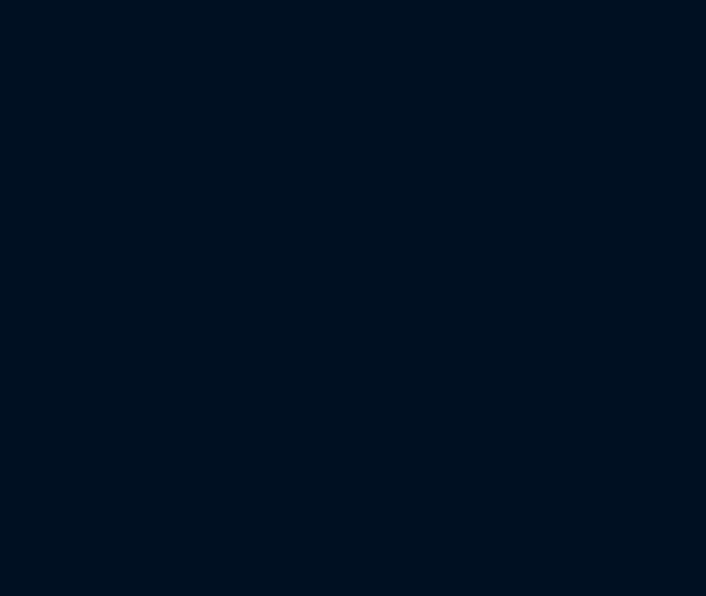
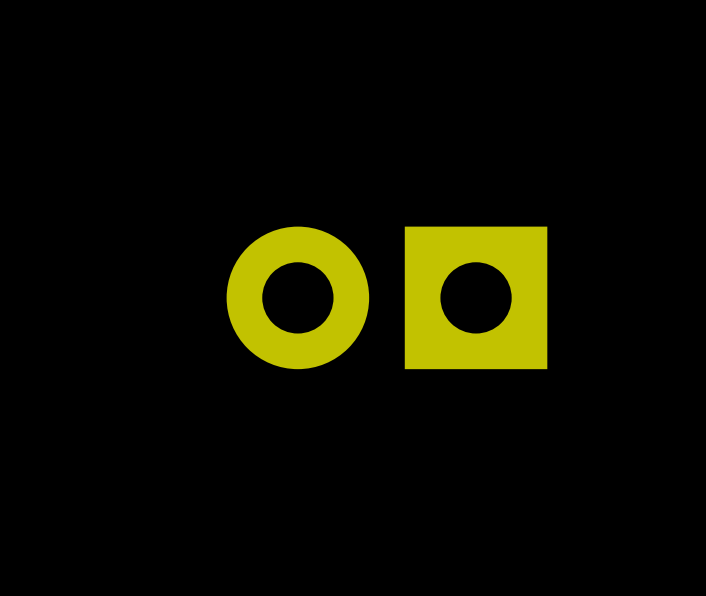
part: none -> (386, 297)

